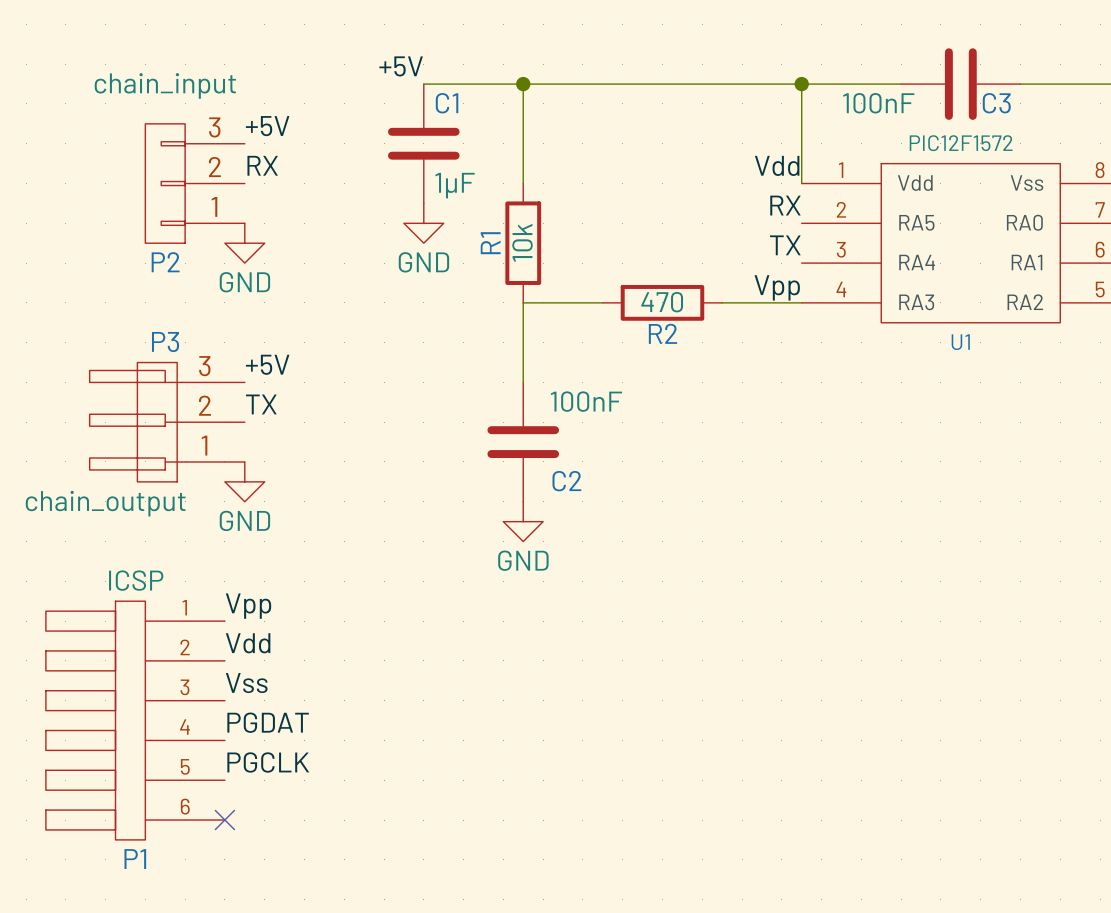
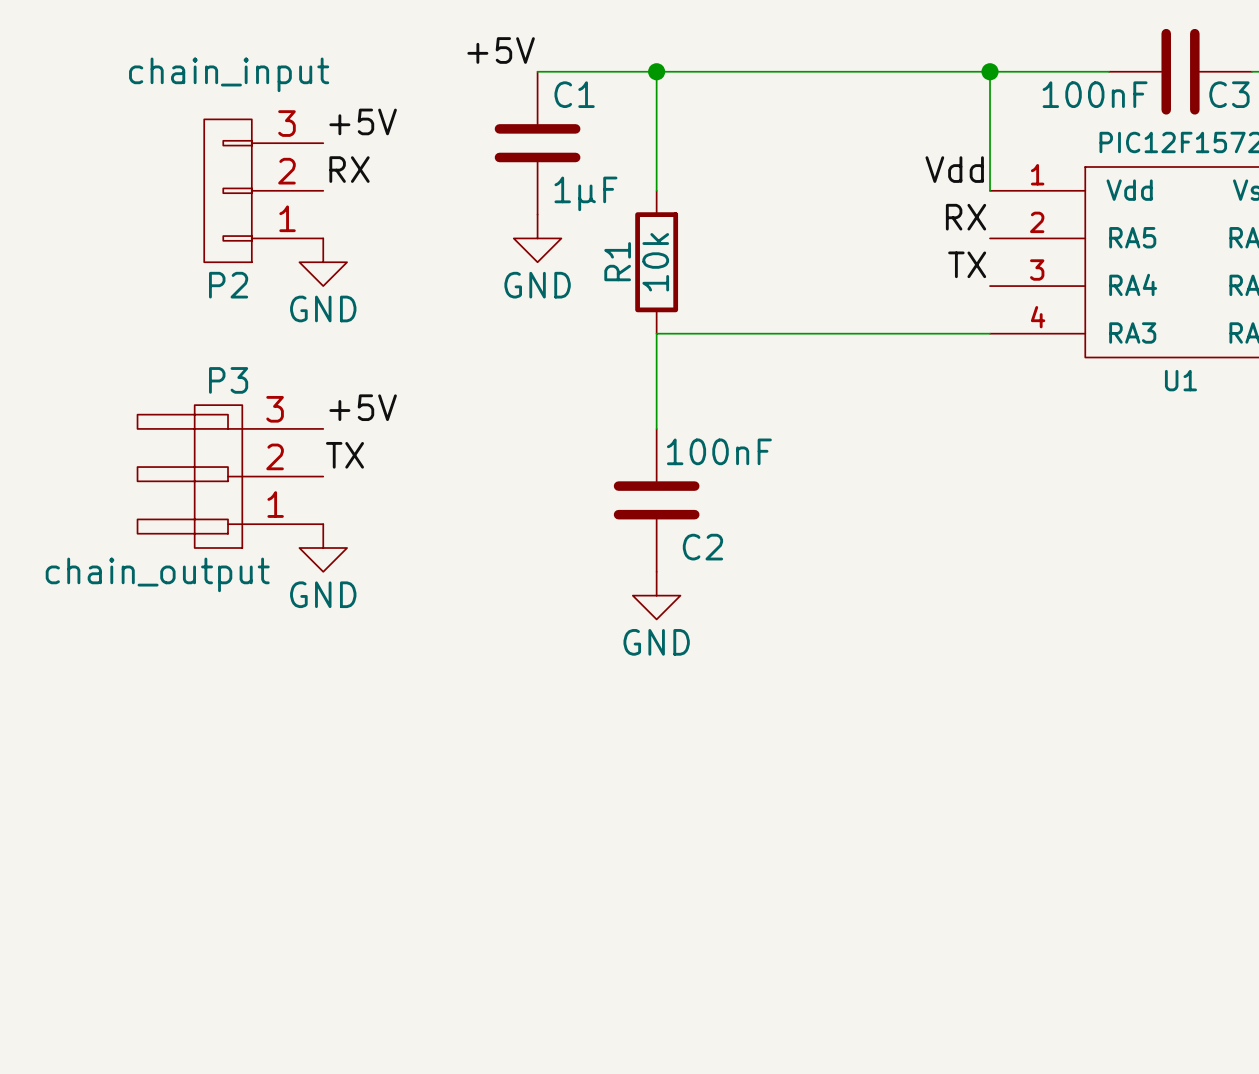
label: Vpp (777, 287) -> none
wire: none -> (751, 333) (894, 333)
R2: 470 (662, 302) -> none
label: Vpp (248, 606) -> none
label: Vdd (248, 643) -> none
label: Vss (246, 682) -> none
P1: ICSP (135, 720) -> none
label: PGDAT (268, 722) -> none
label: PGCLK (268, 762) -> none
no-connect mark: (224, 820) -> none

